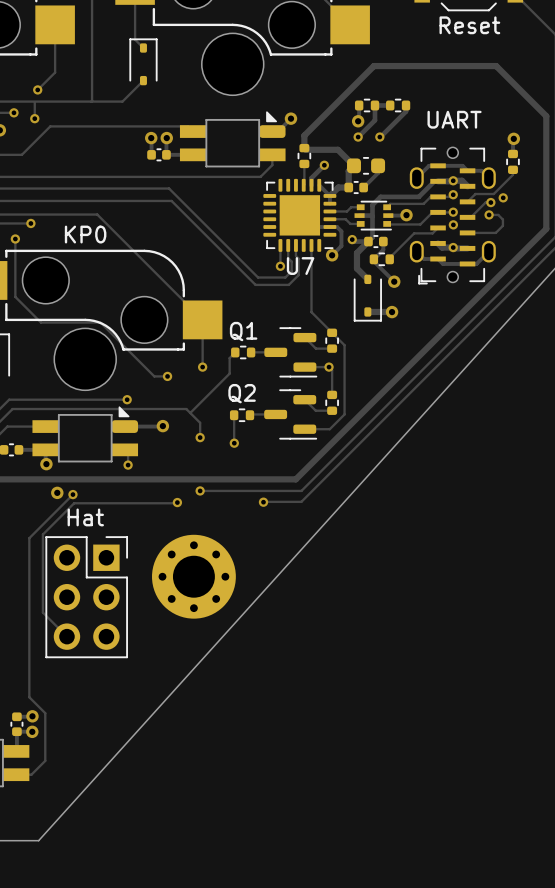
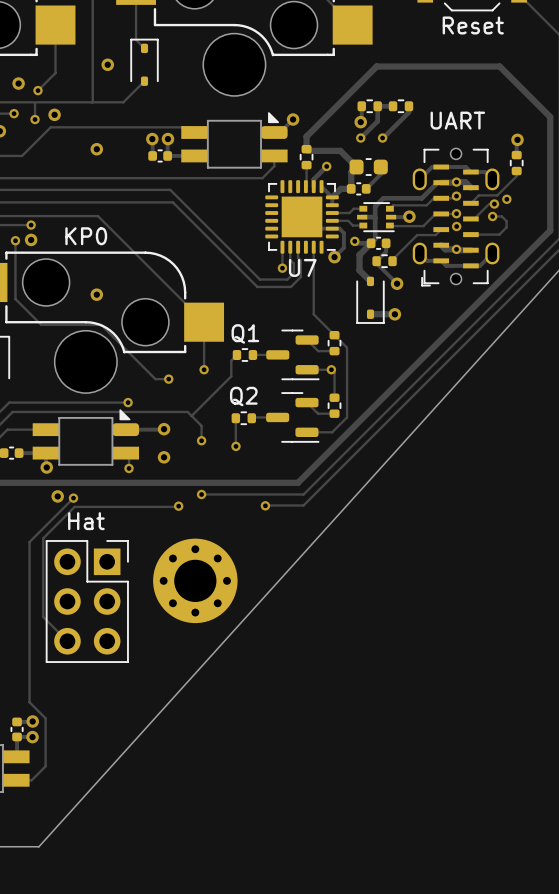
via: none -> (107, 64)
via: none -> (18, 83)
via: none -> (54, 114)
via: none -> (96, 149)
via: none -> (31, 239)
via: none -> (96, 294)
via: none -> (164, 457)

